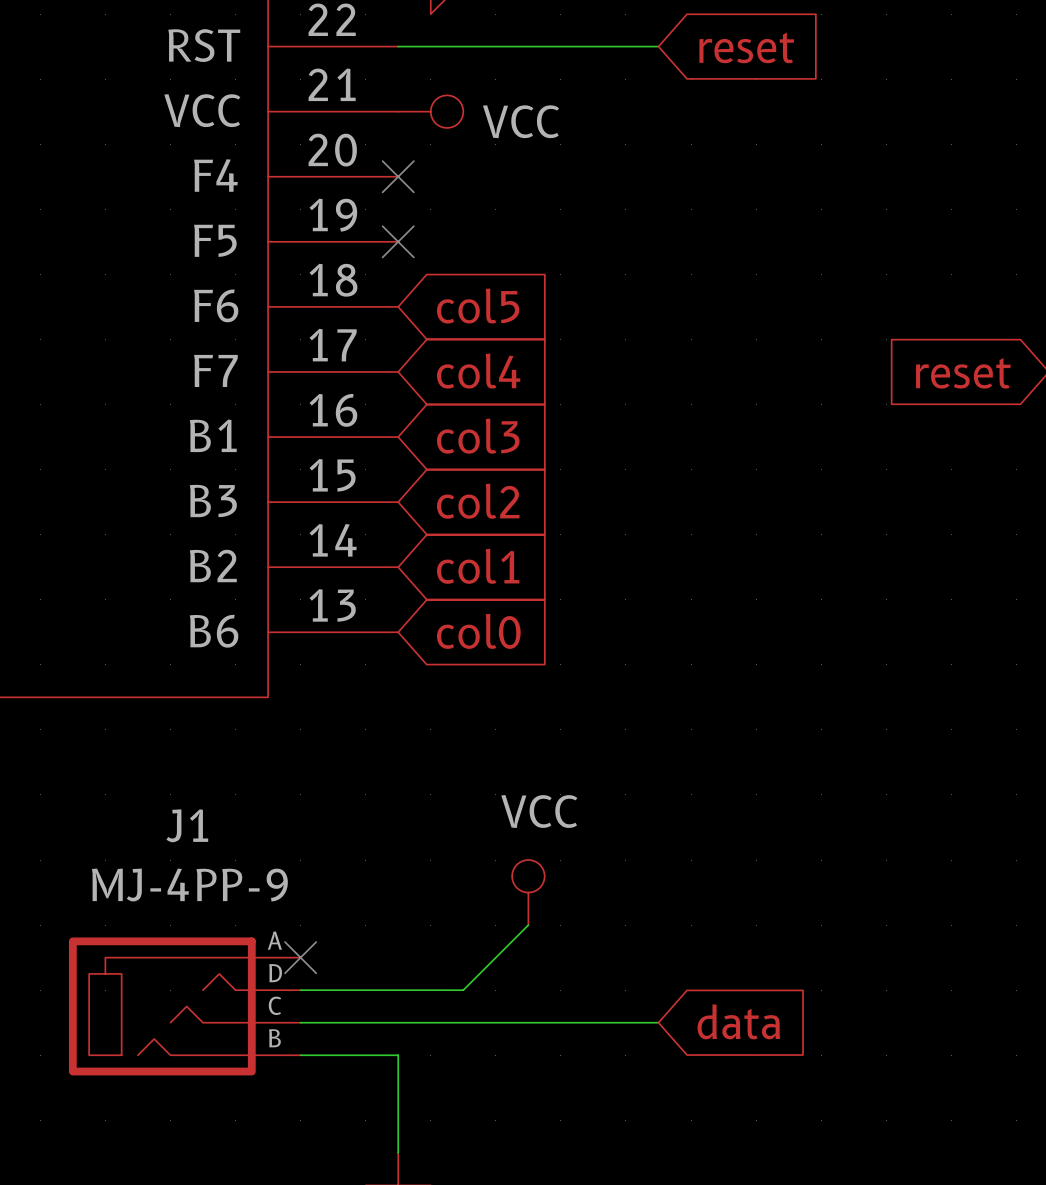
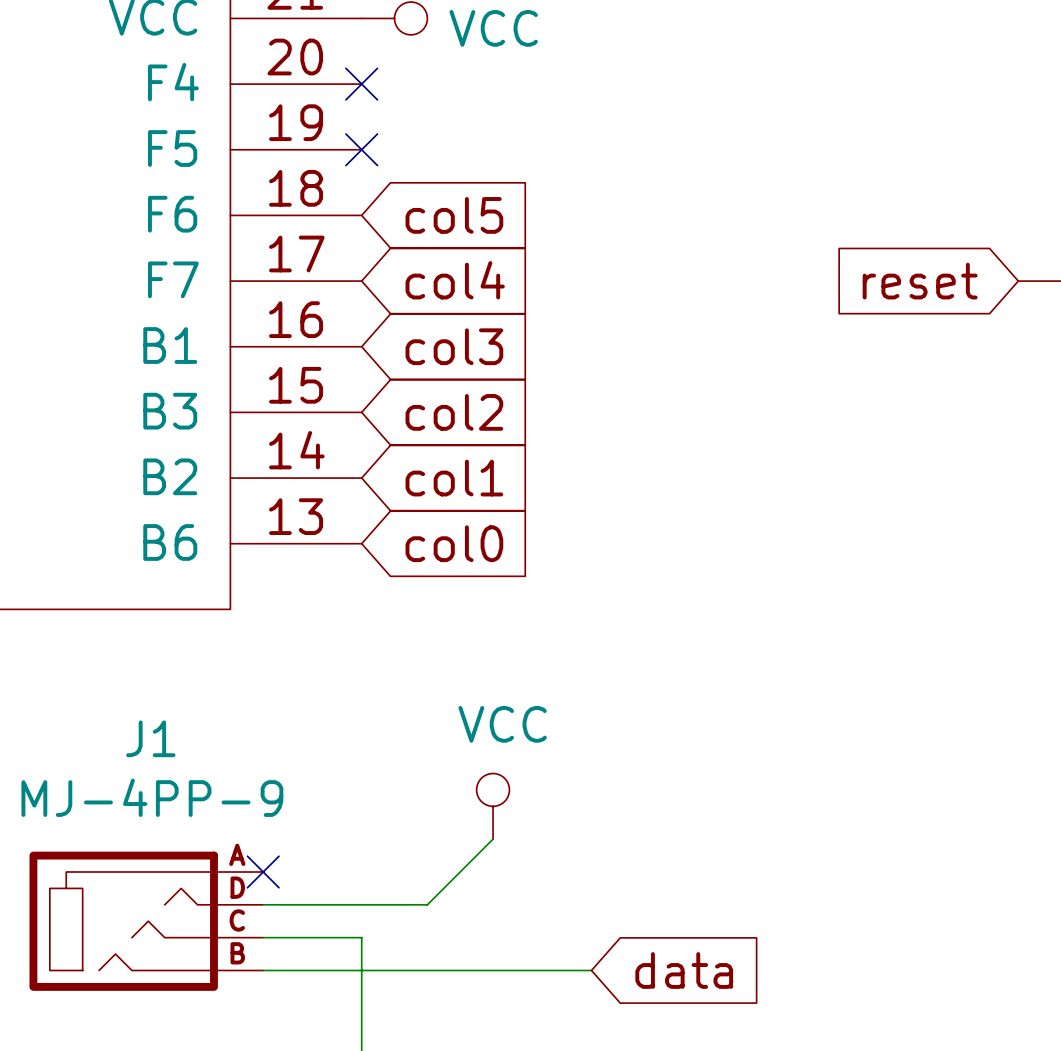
global label position: data (738, 1021) -> data (684, 970)
wire: (398, 1022) (658, 1022) -> (361, 937) (361, 970) (591, 970)

